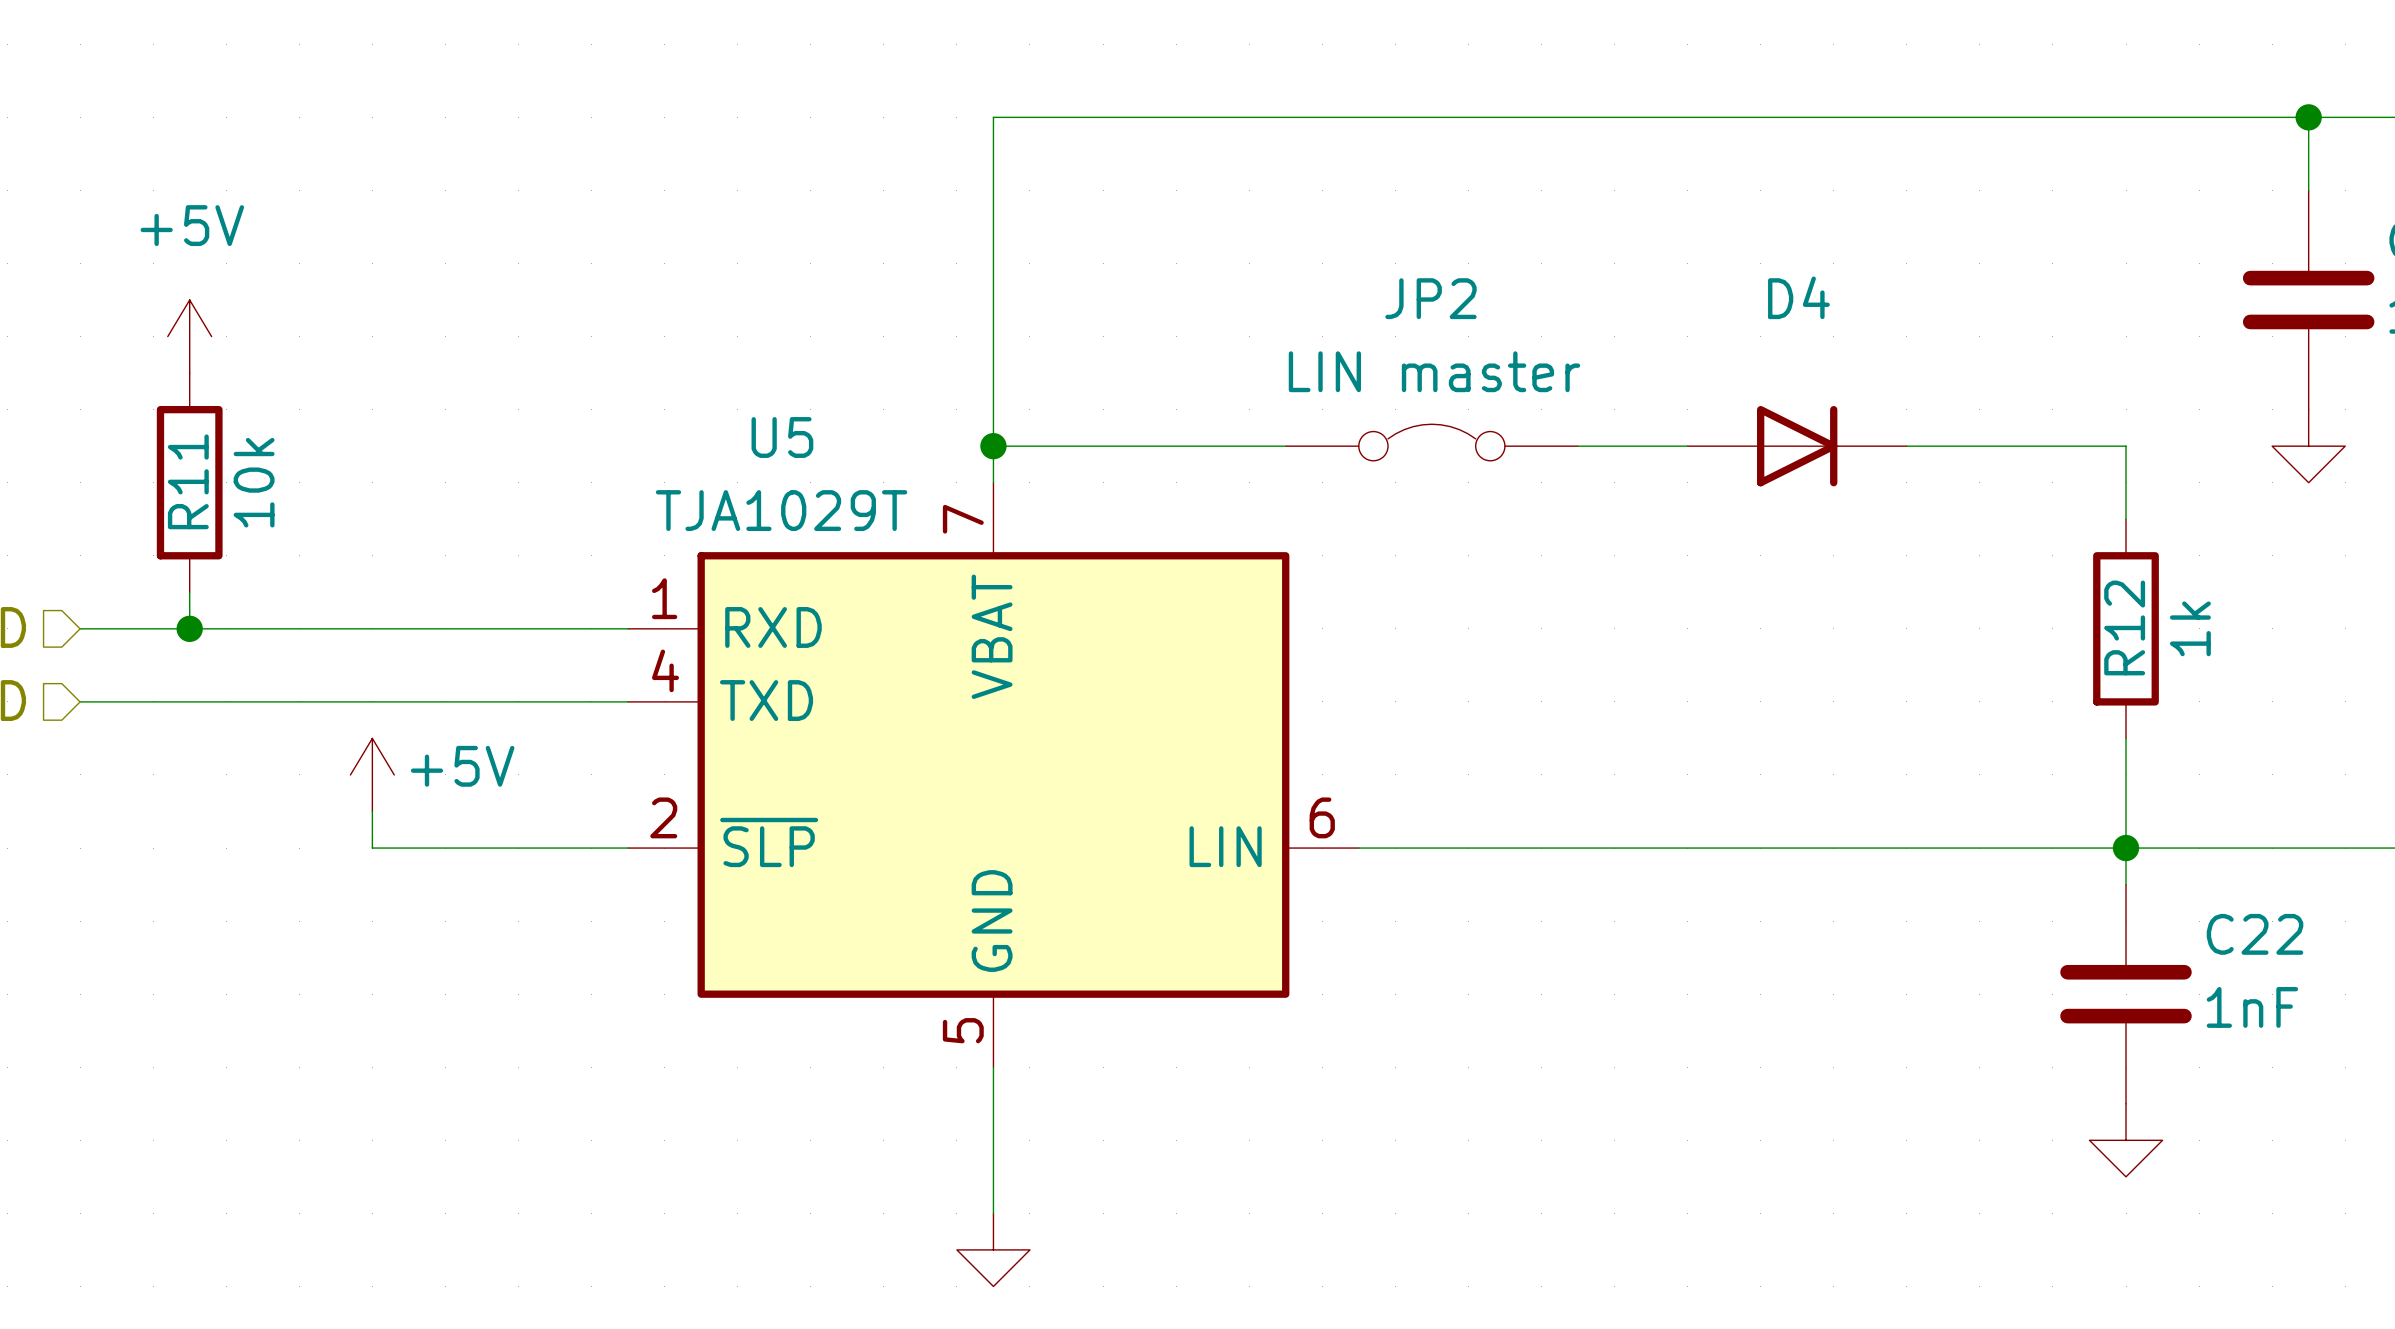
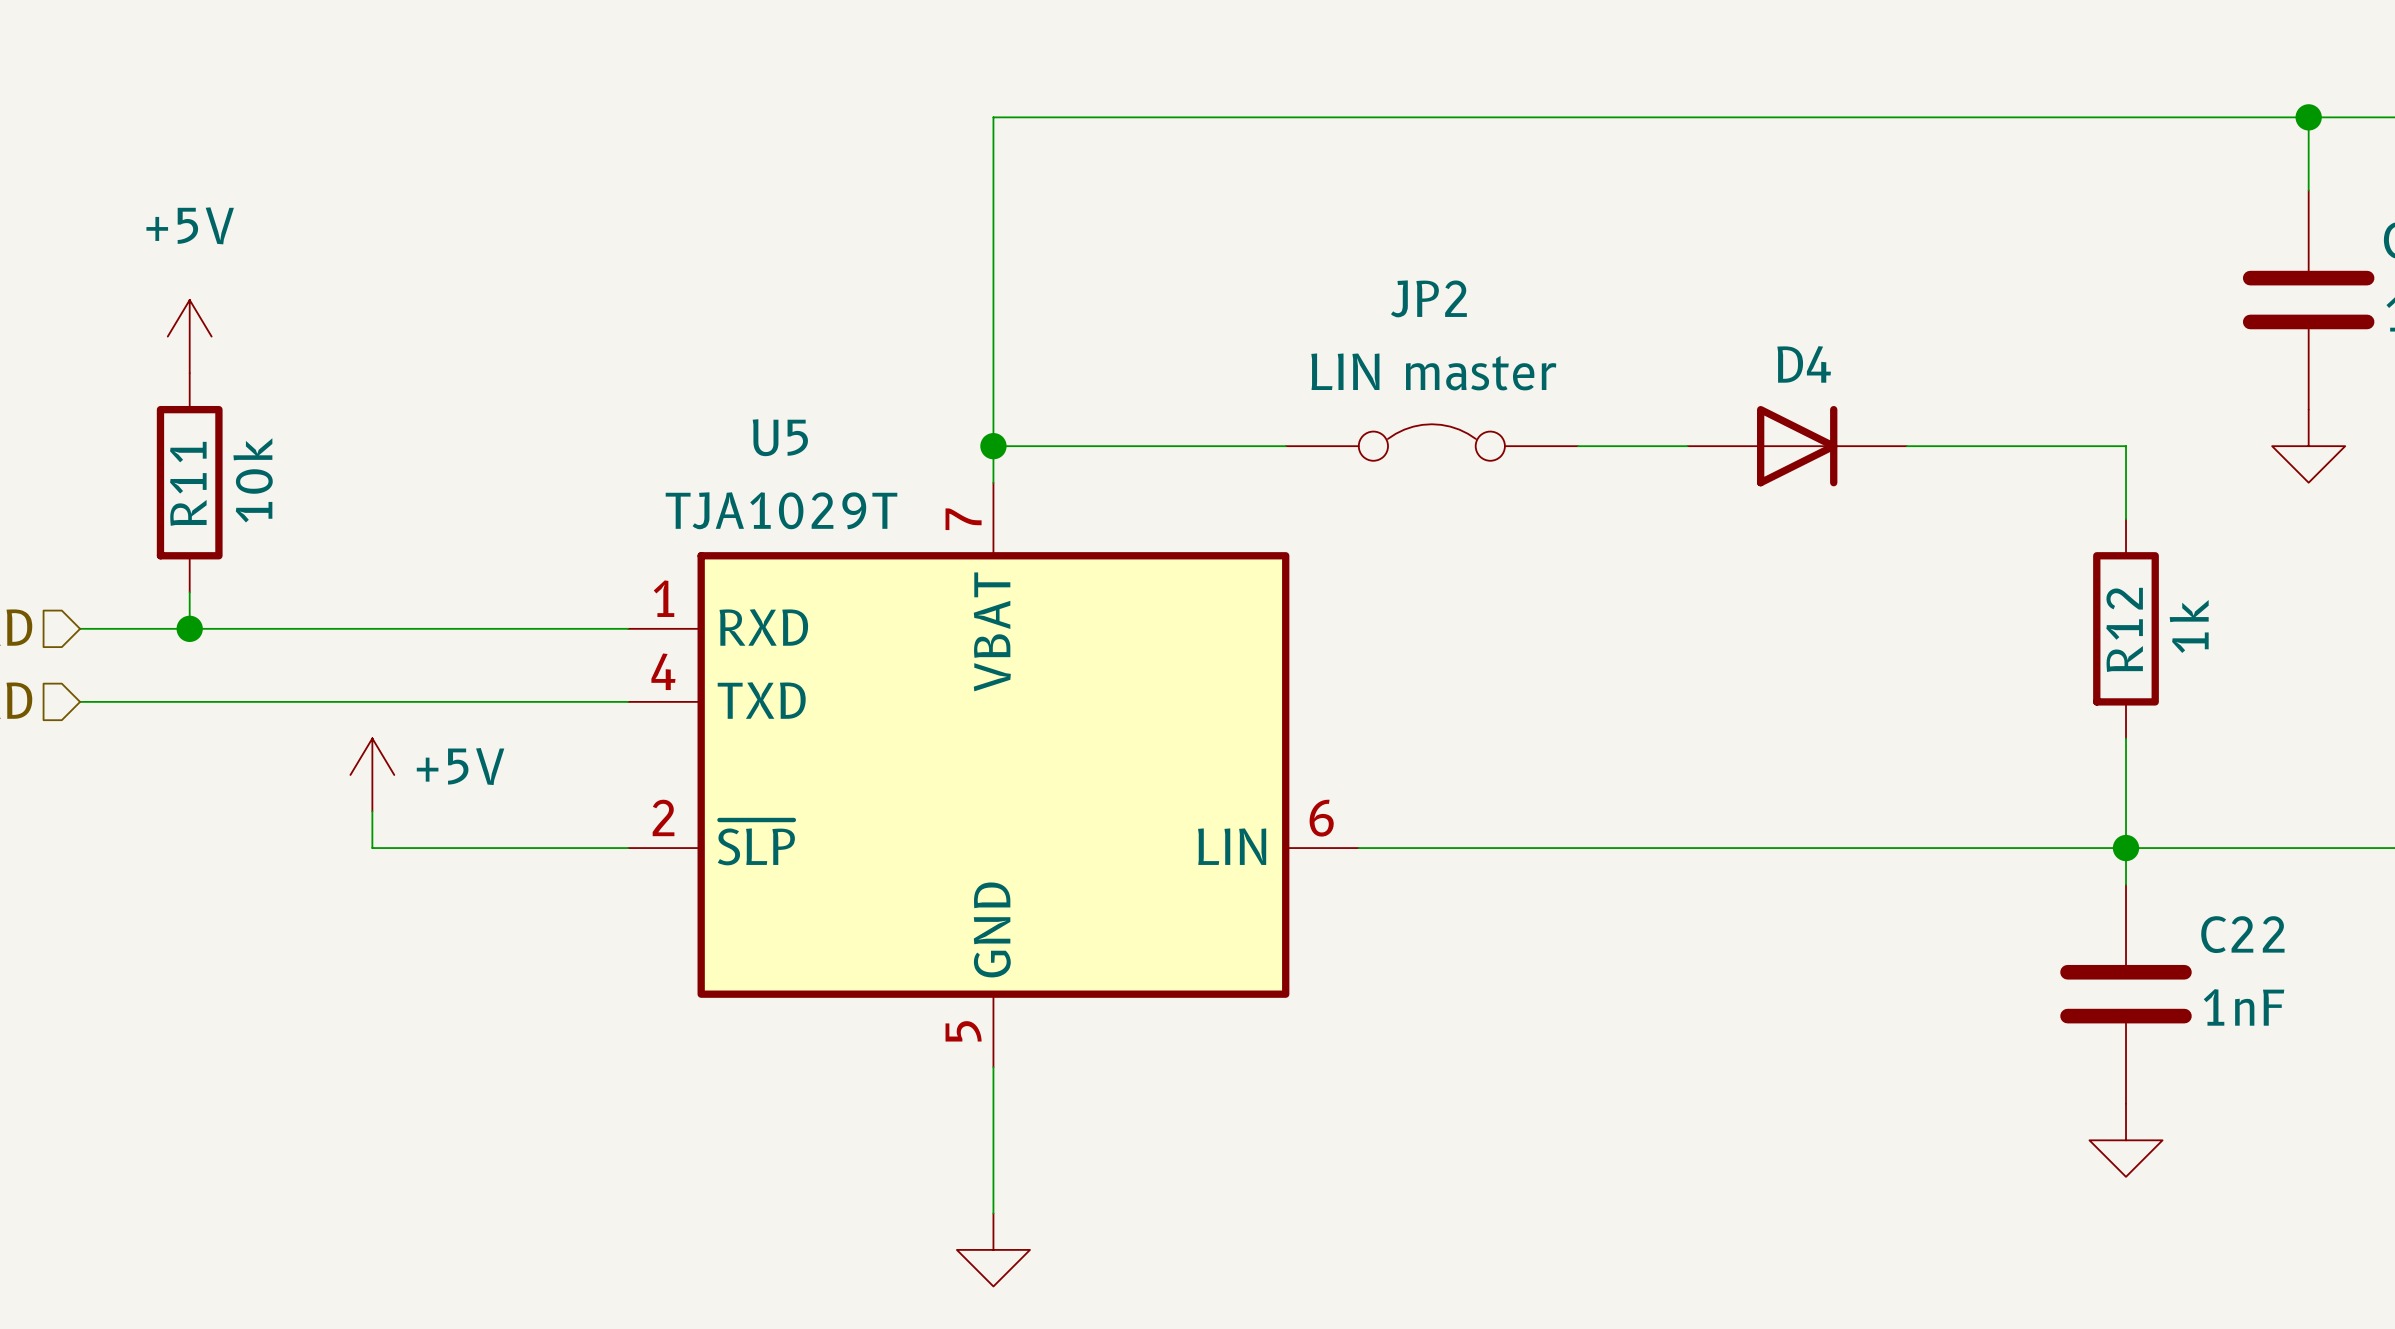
D4 name position: D4 (1798, 297) -> D4 (1804, 364)

